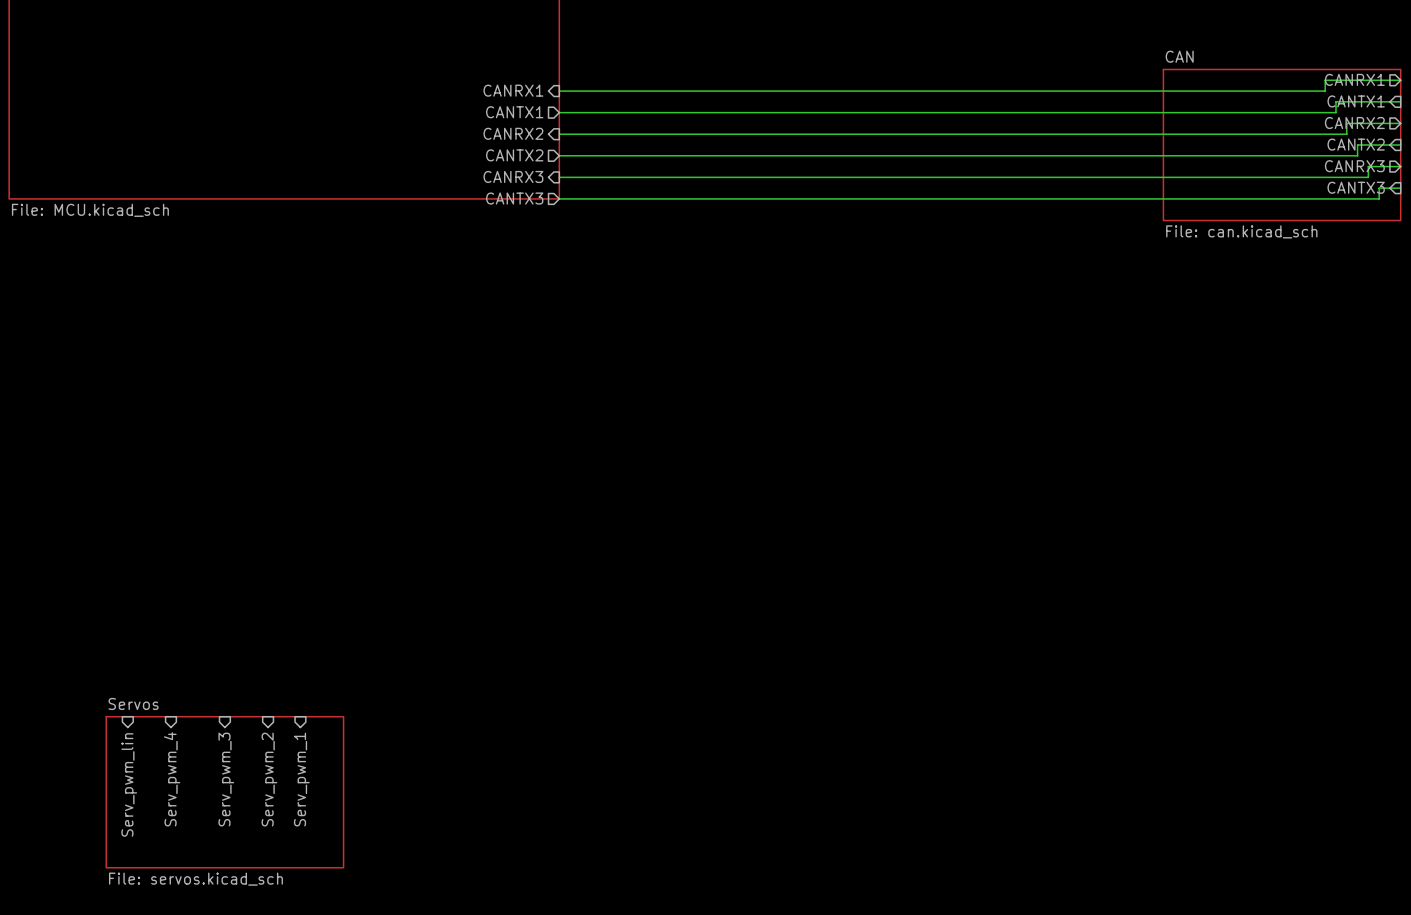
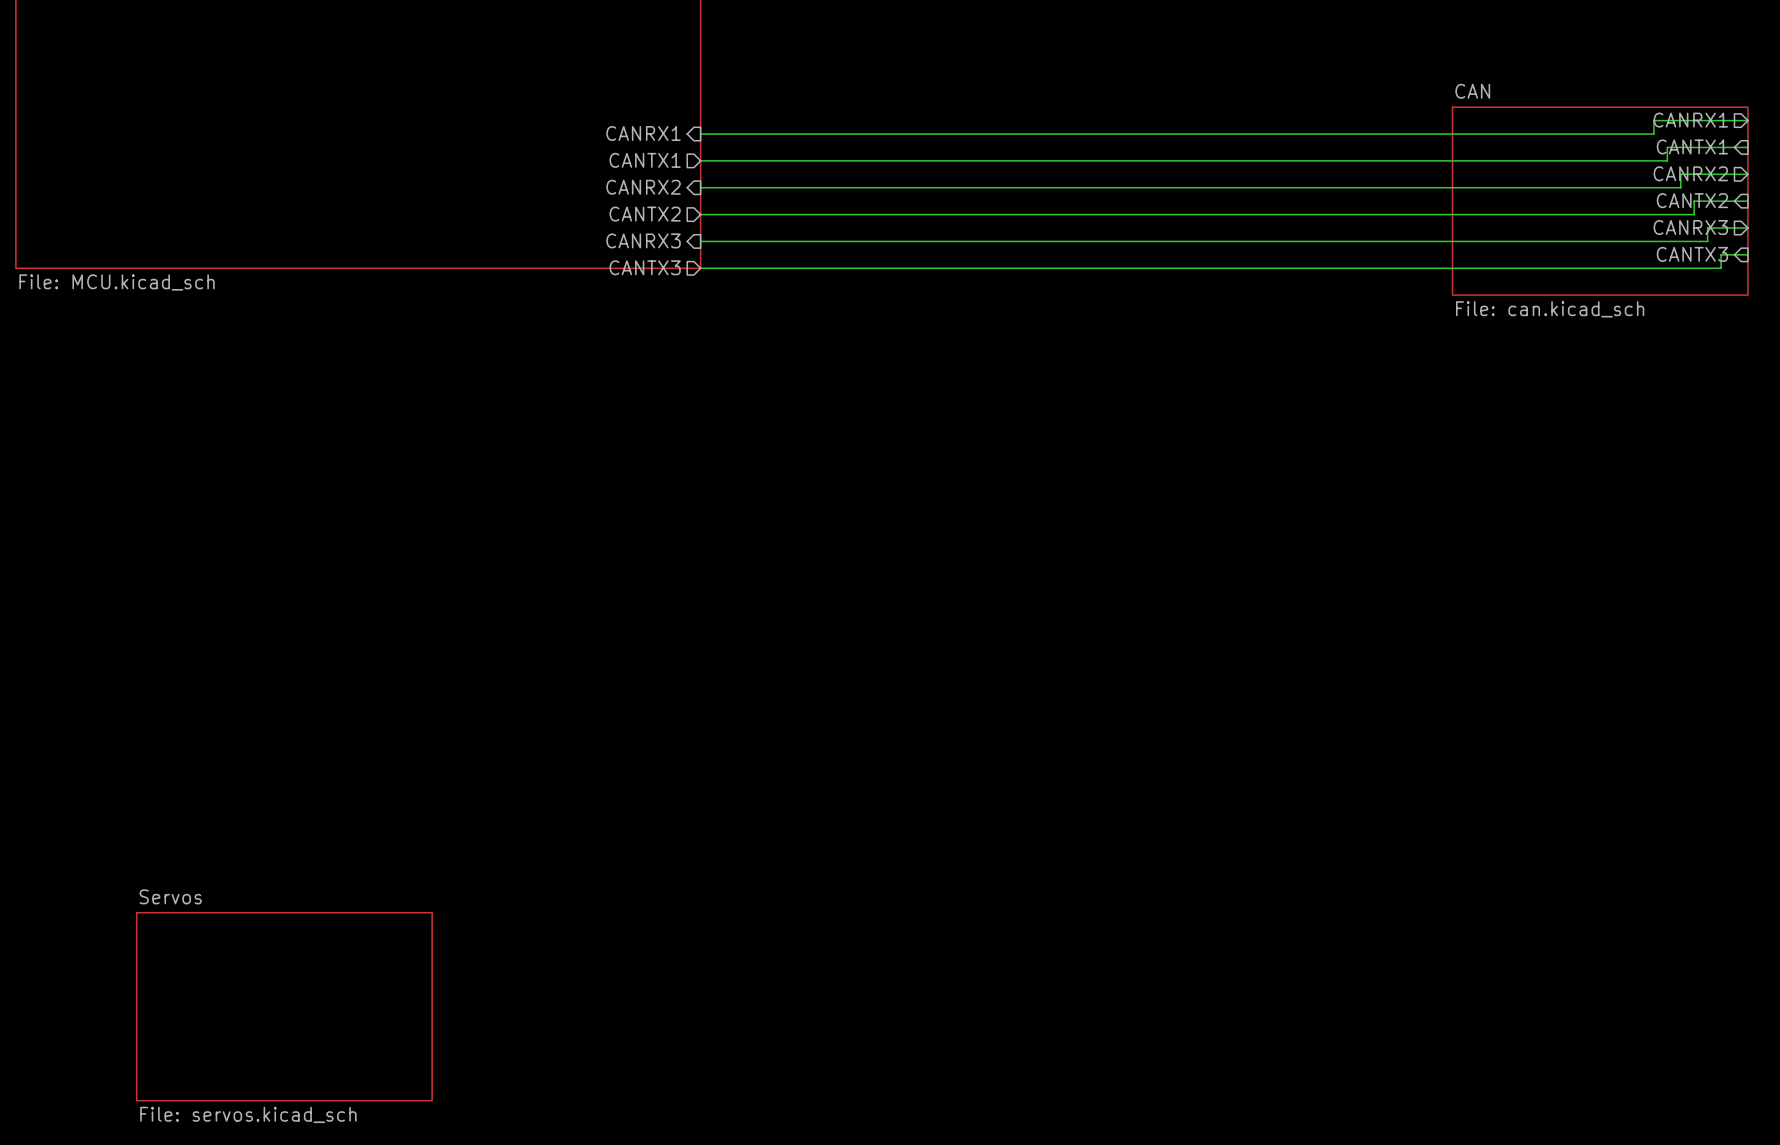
sheet pin: Serv_pwm_4 (172, 779) -> none
sheet pin: Serv_pwm_3 (226, 779) -> none
sheet pin: Serv_pwm_2 (269, 779) -> none
sheet pin: Serv_pwm_1 (301, 779) -> none
sheet pin: Serv_pwm_lin (129, 784) -> none

